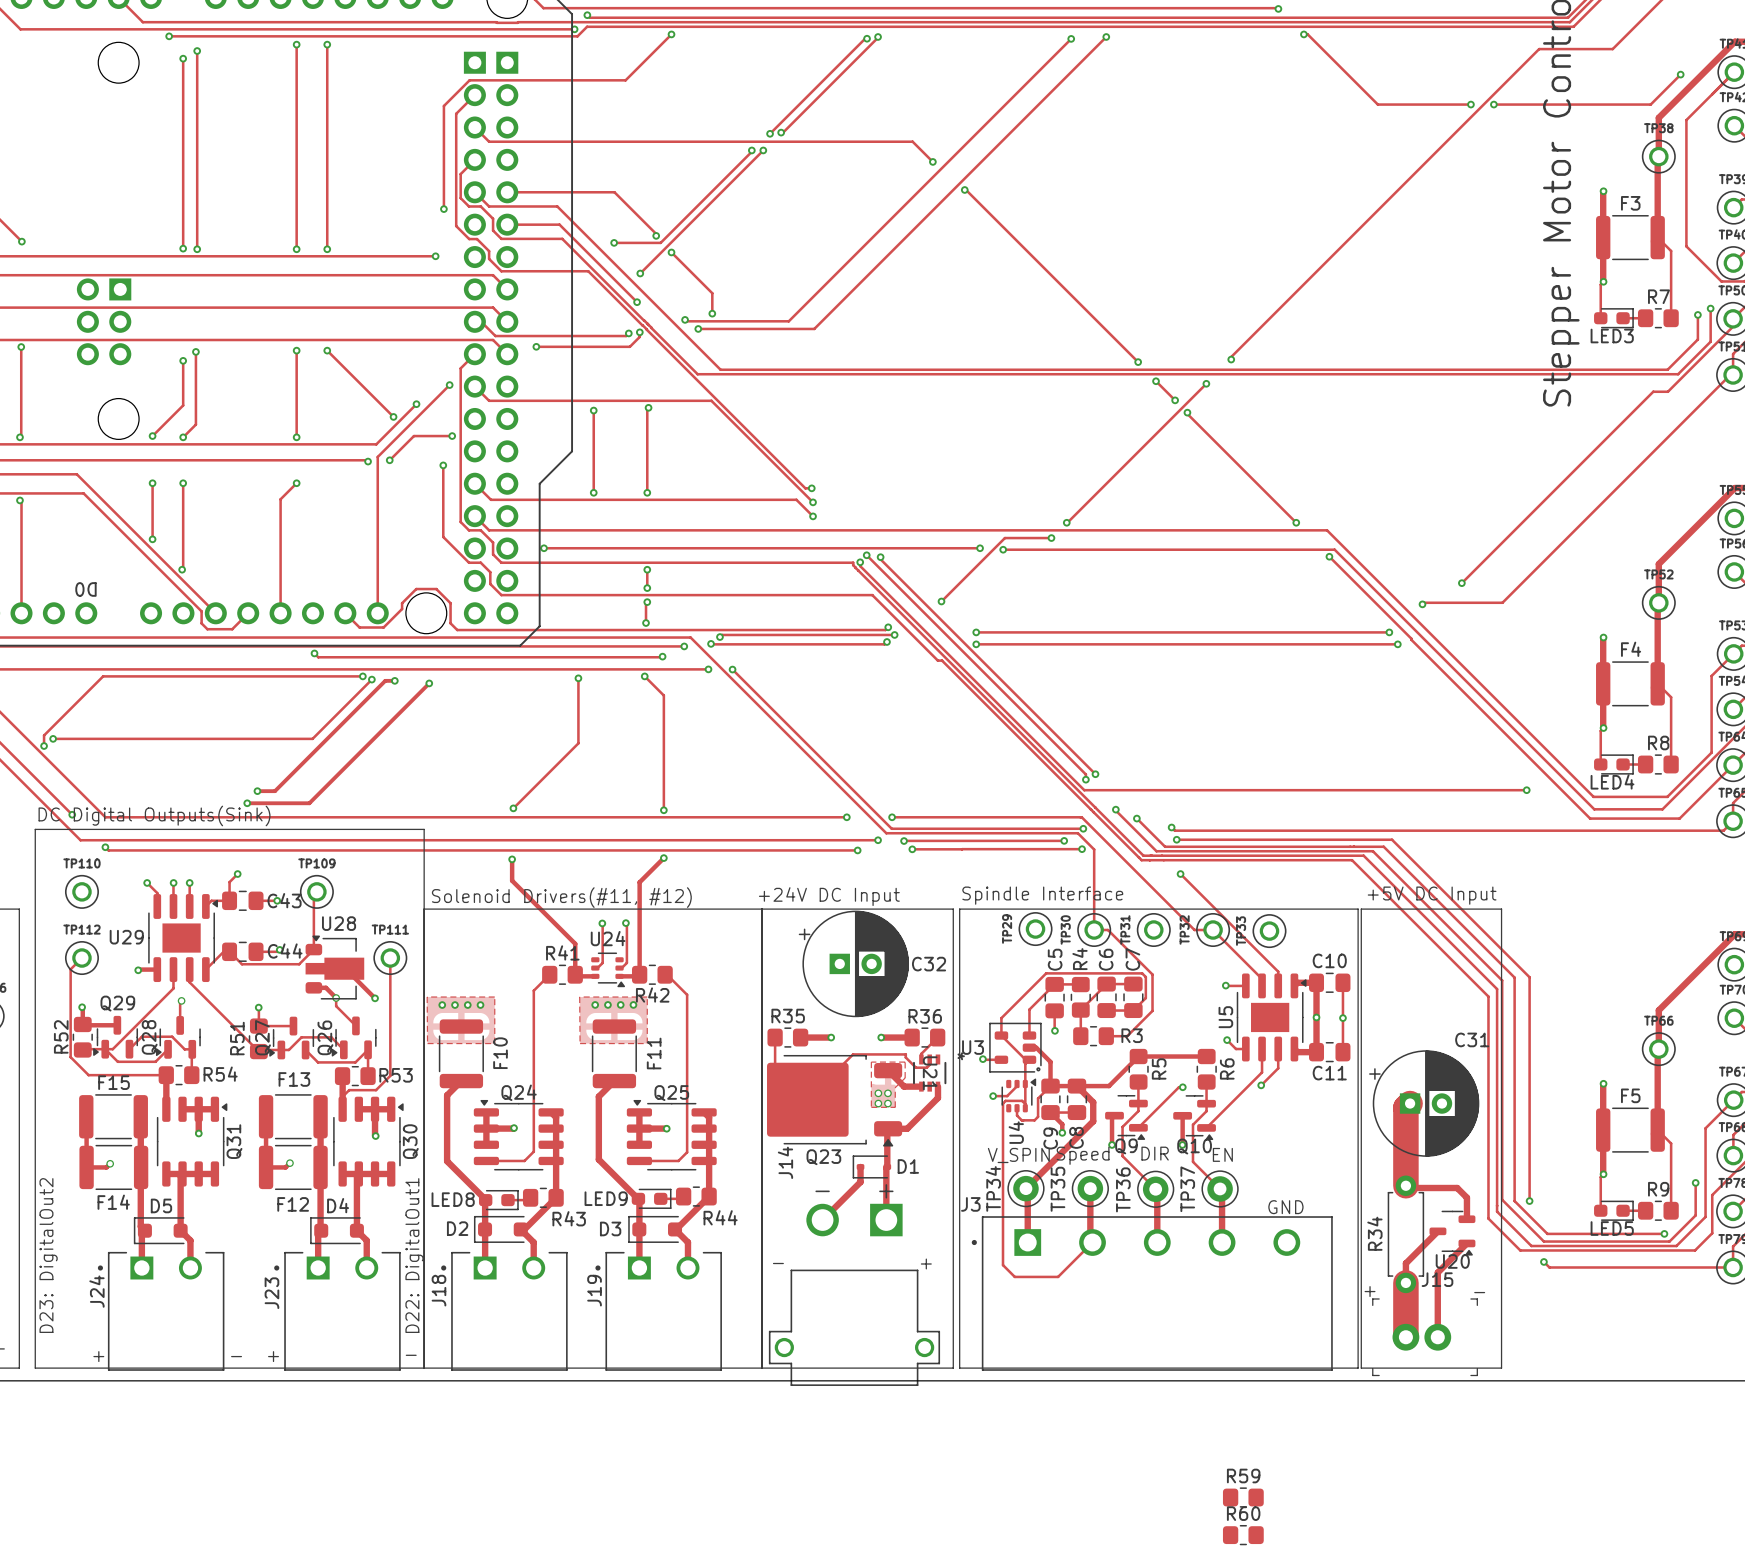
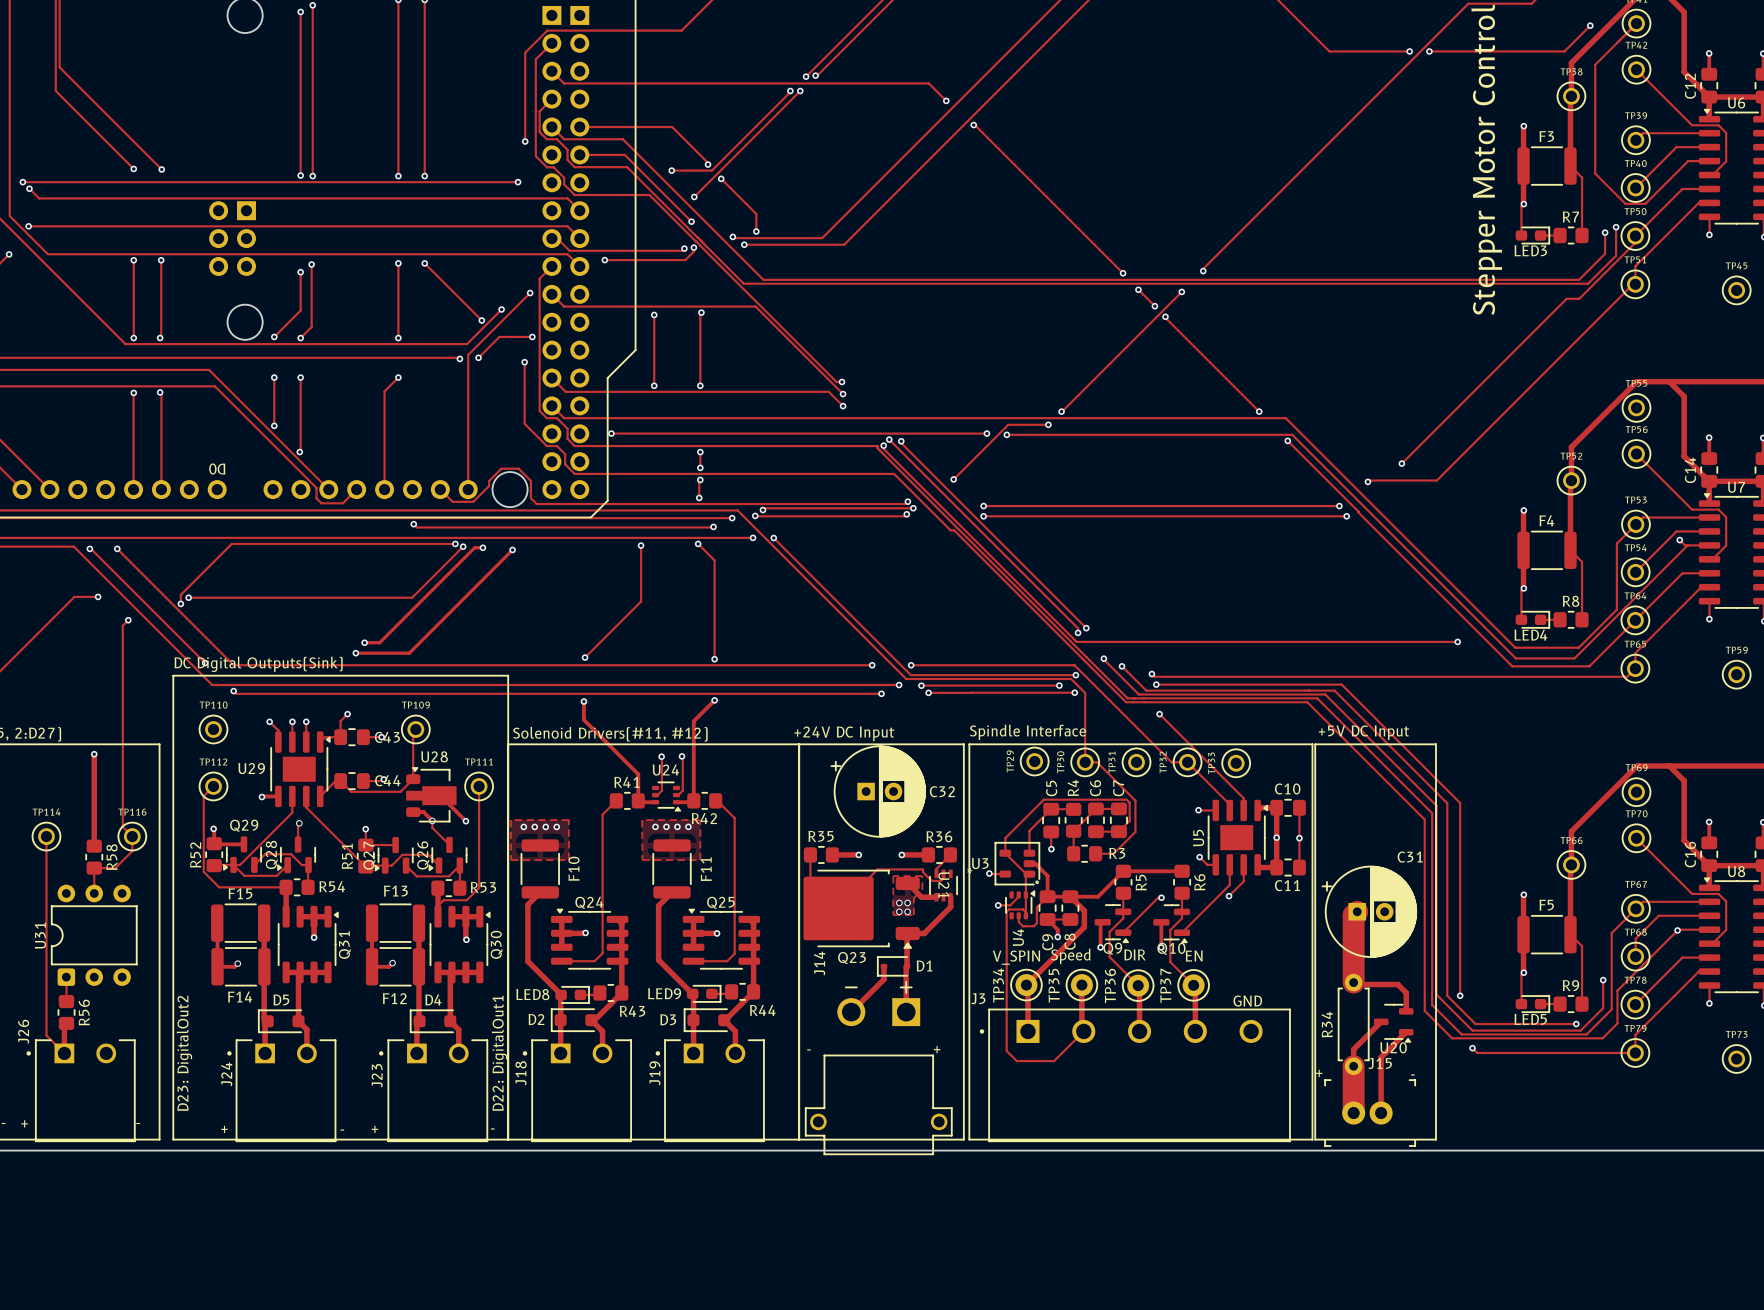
R59: (1243, 1497) -> none
R60: (1243, 1535) -> none

